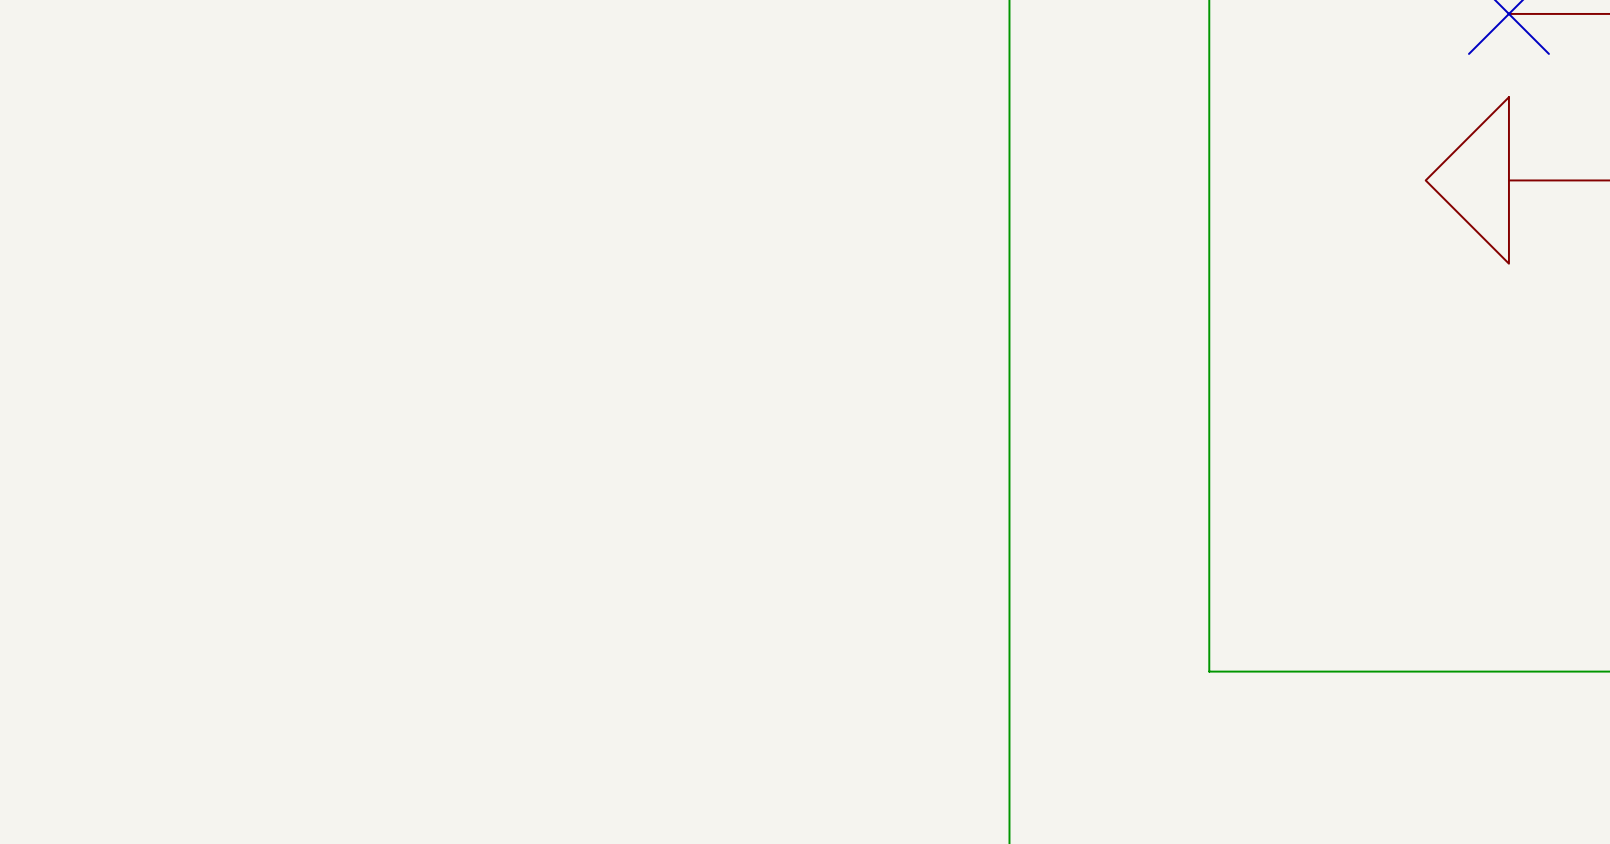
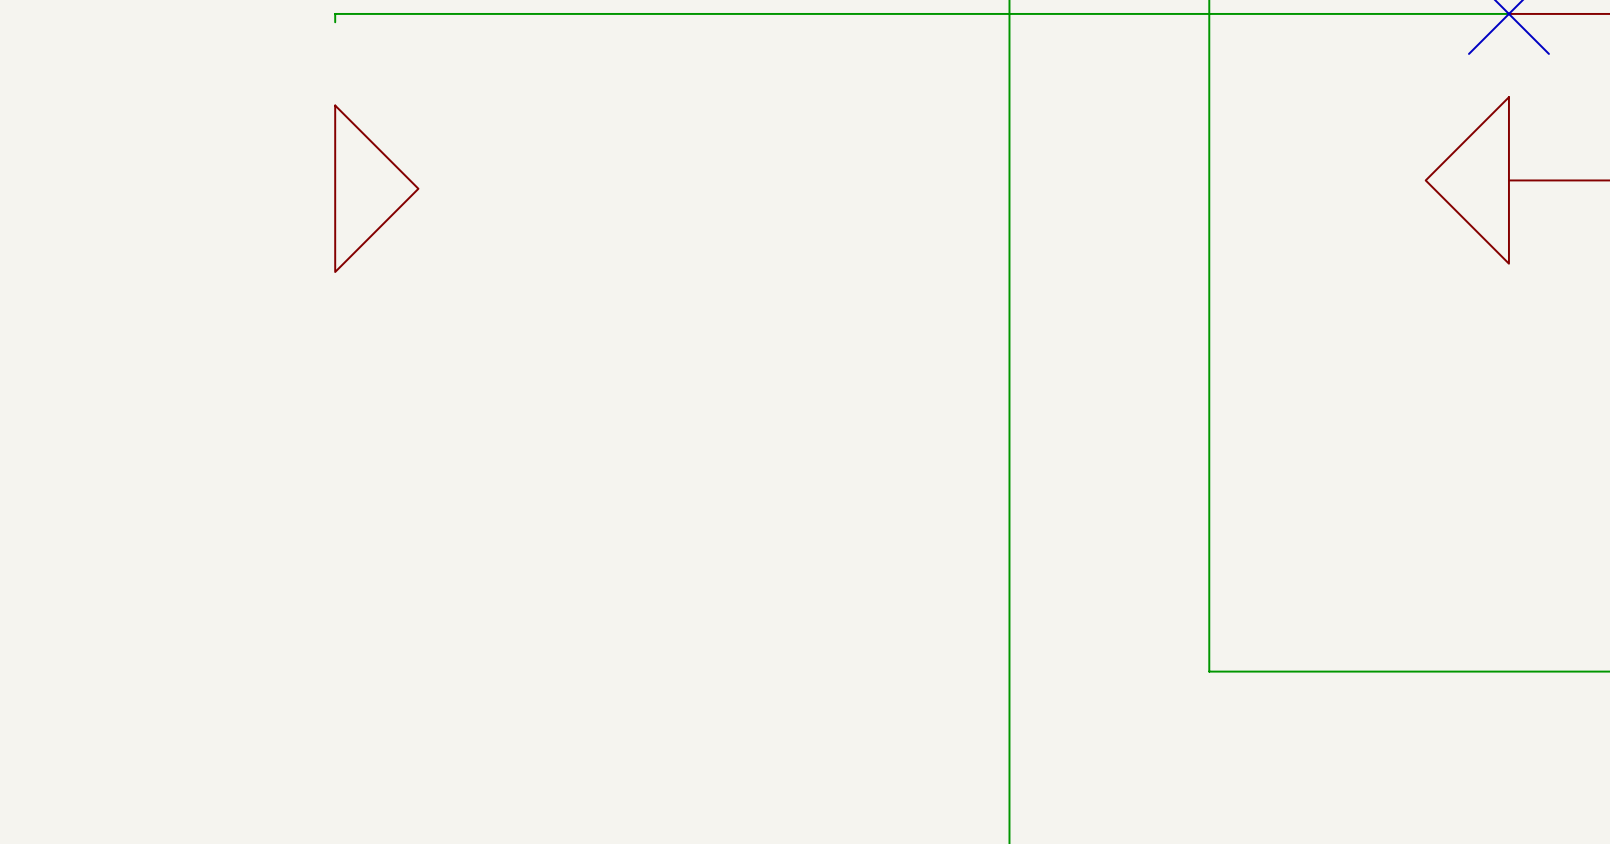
wire: none -> (1508, 13) (335, 13) (335, 22)
power symbol: none -> (376, 188)

